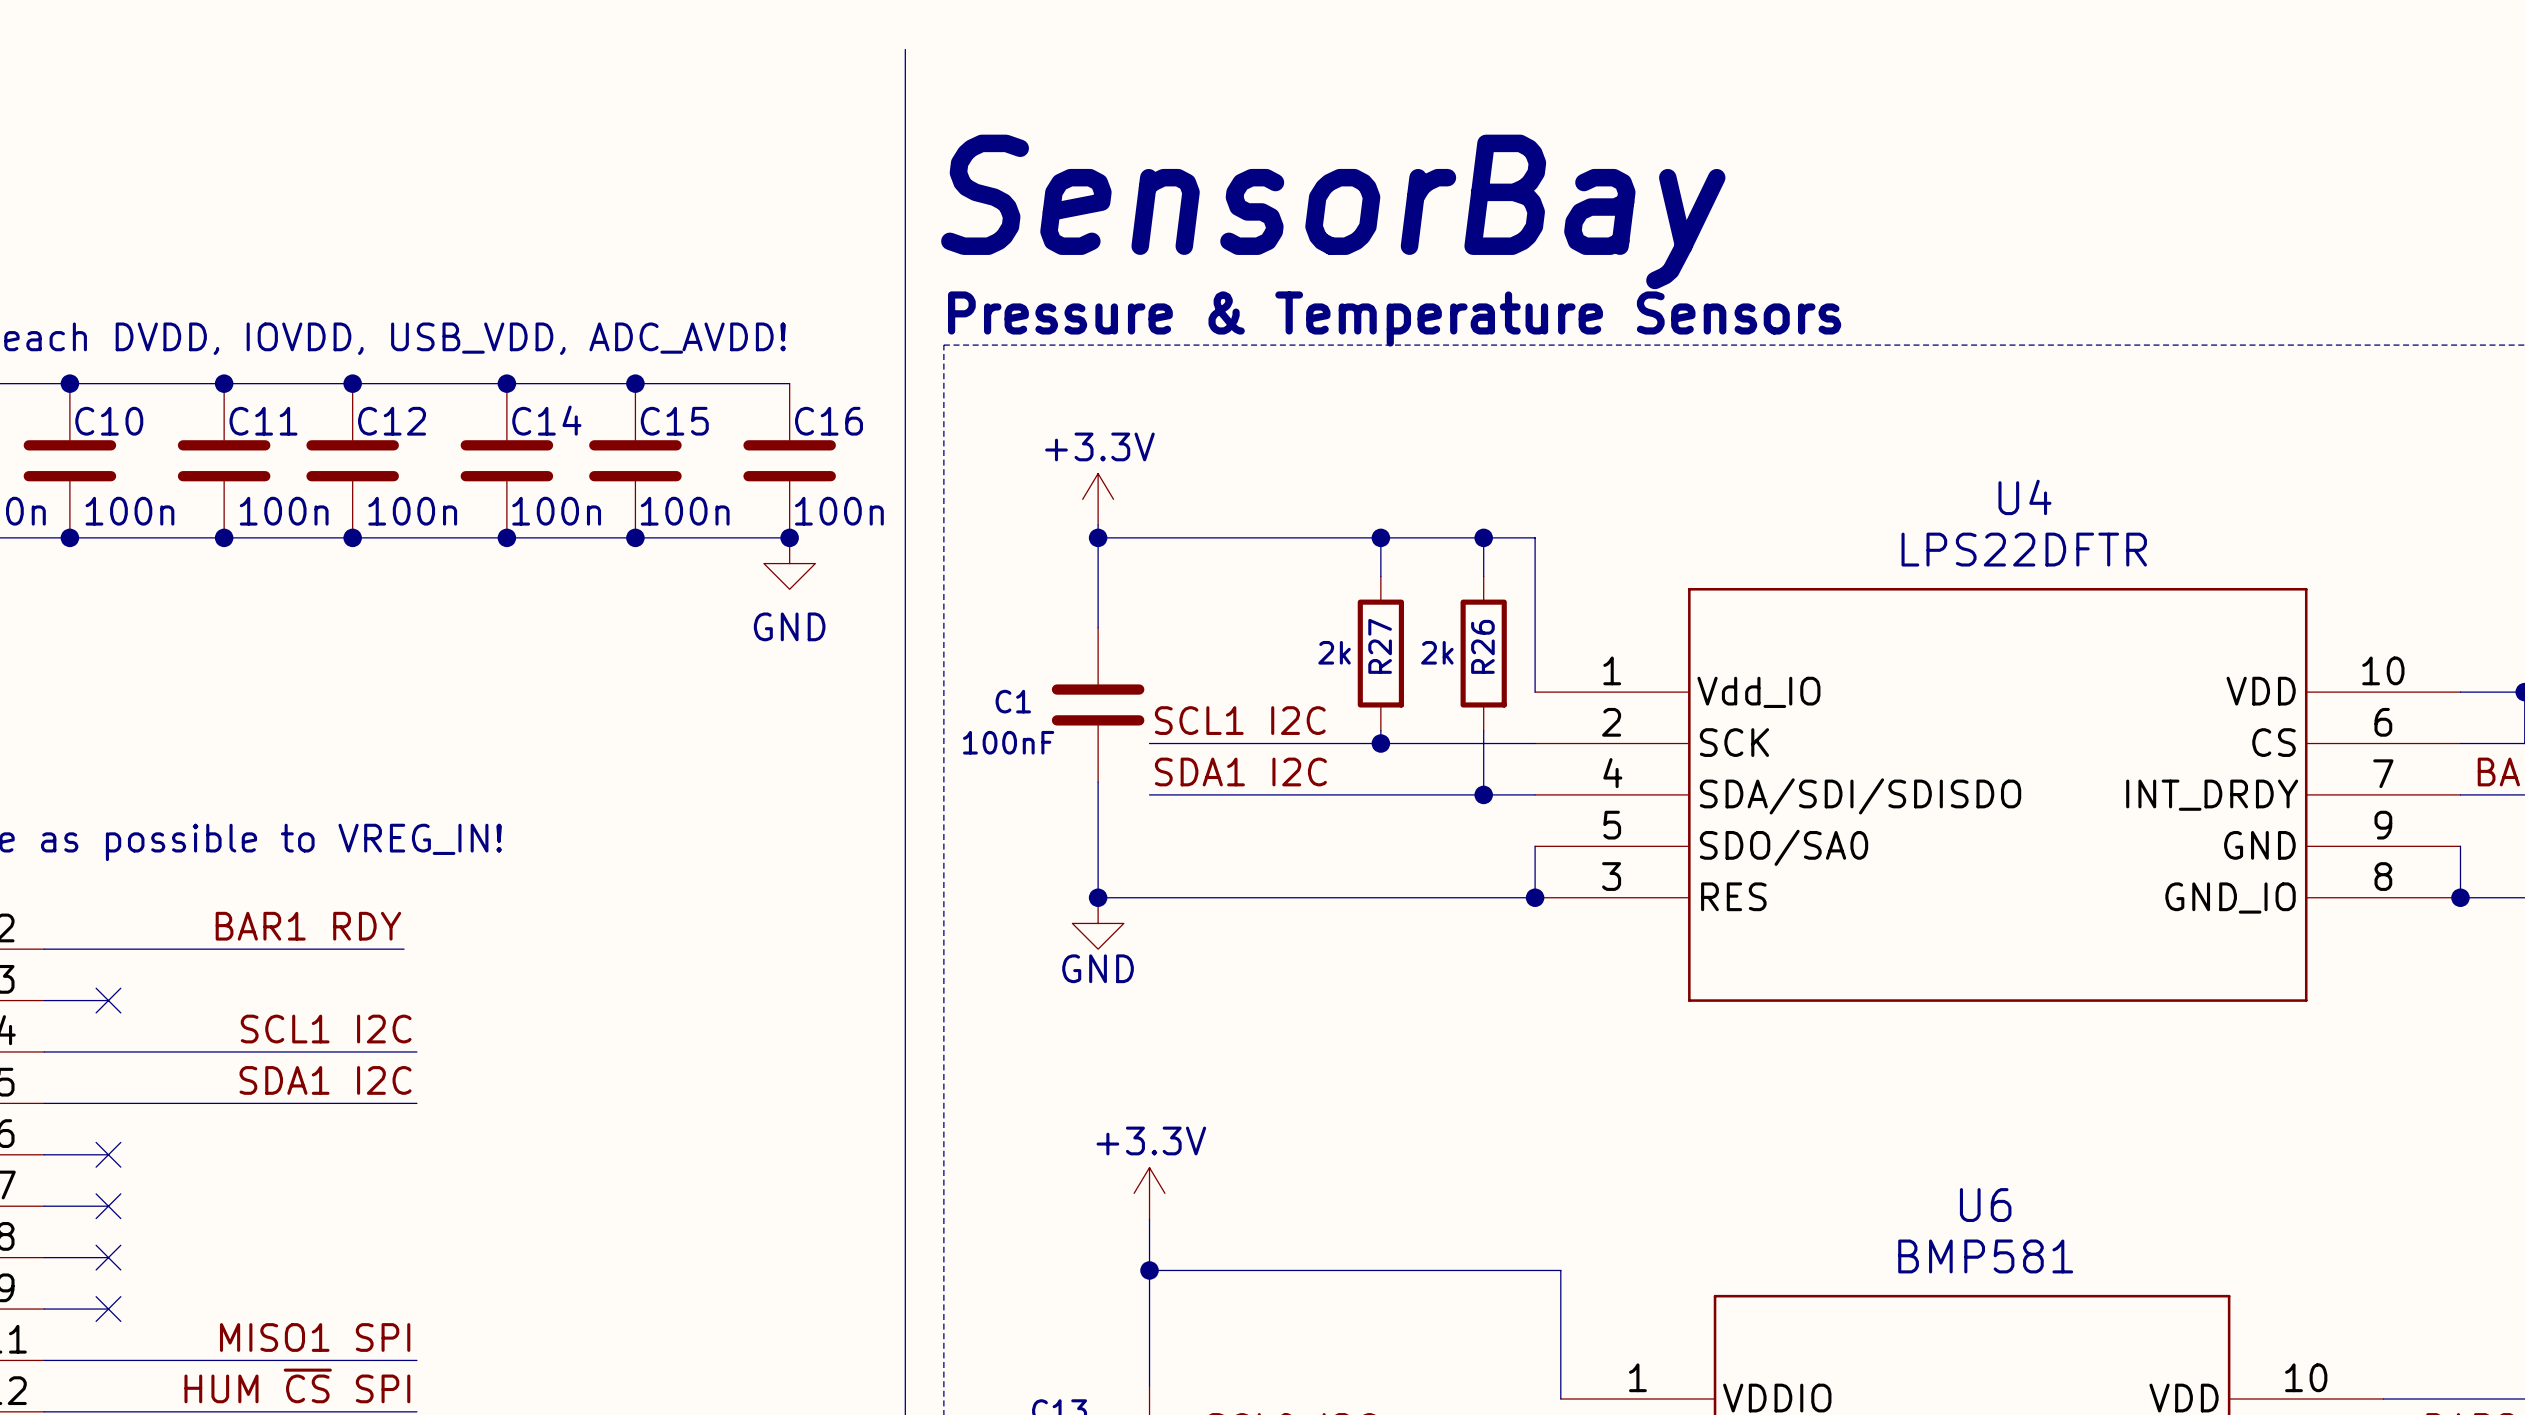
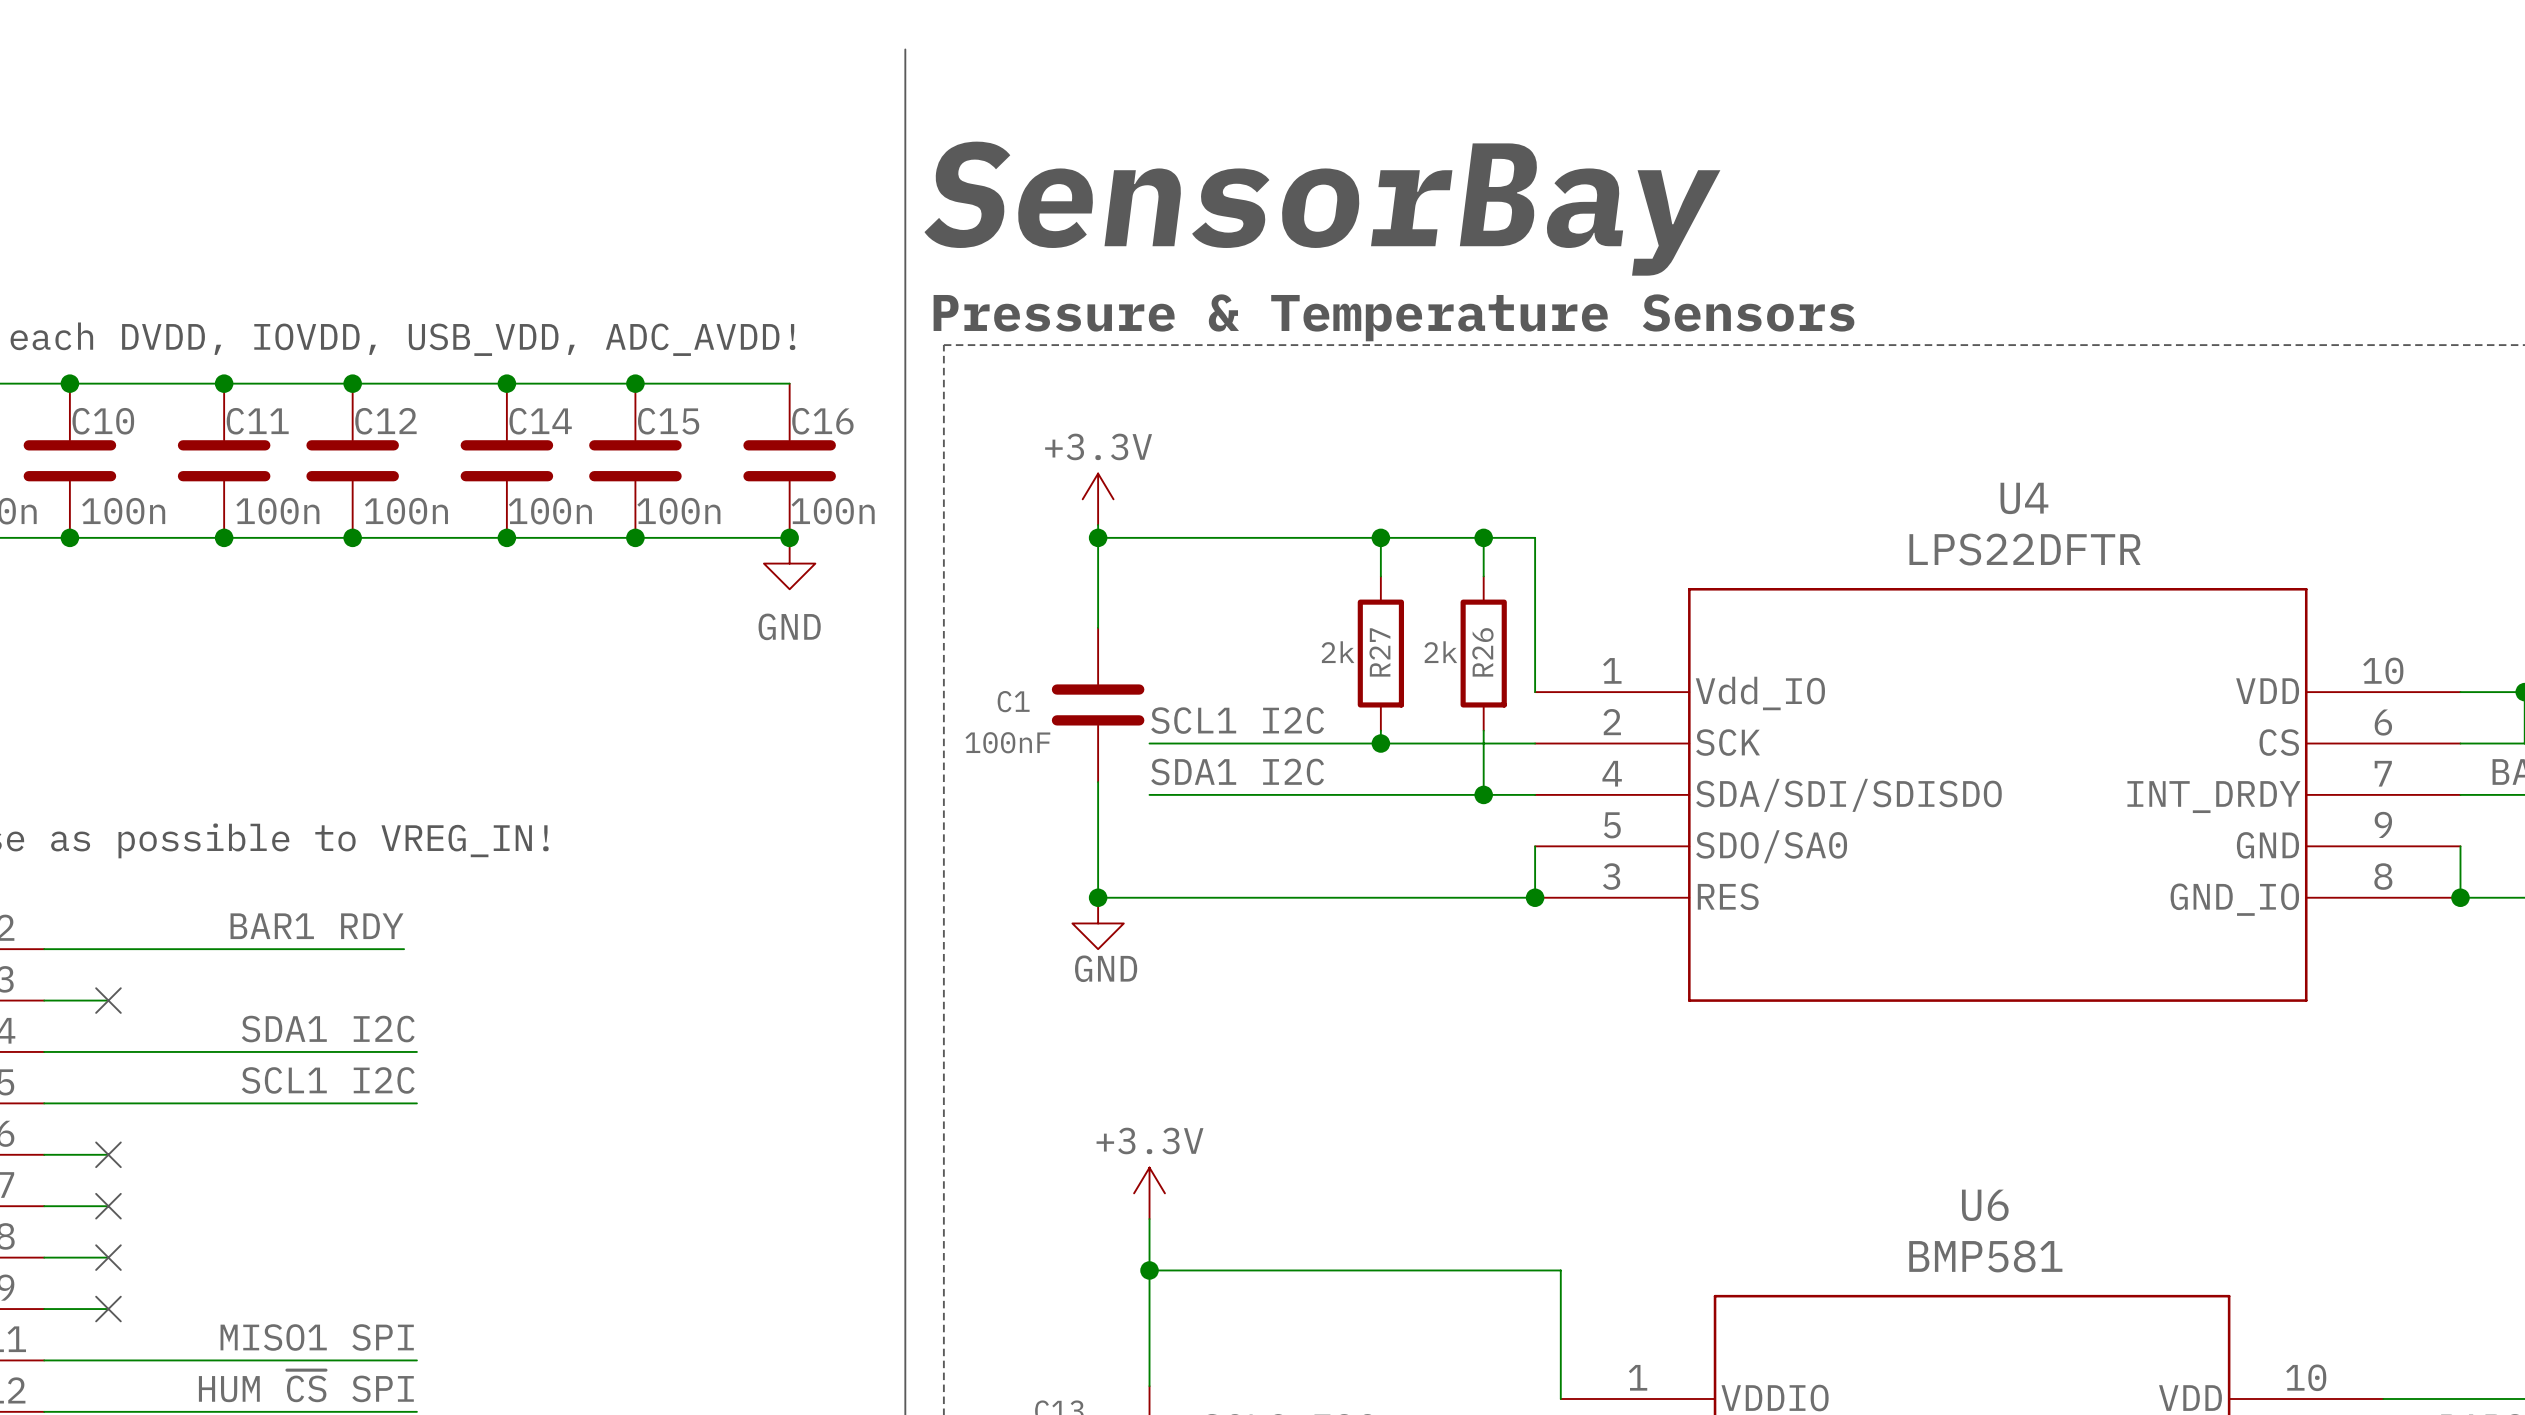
label: SCL1 I2C (326, 1029) -> SDA1 I2C (328, 1029)
label: SDA1 I2C (325, 1080) -> SCL1 I2C (328, 1080)

